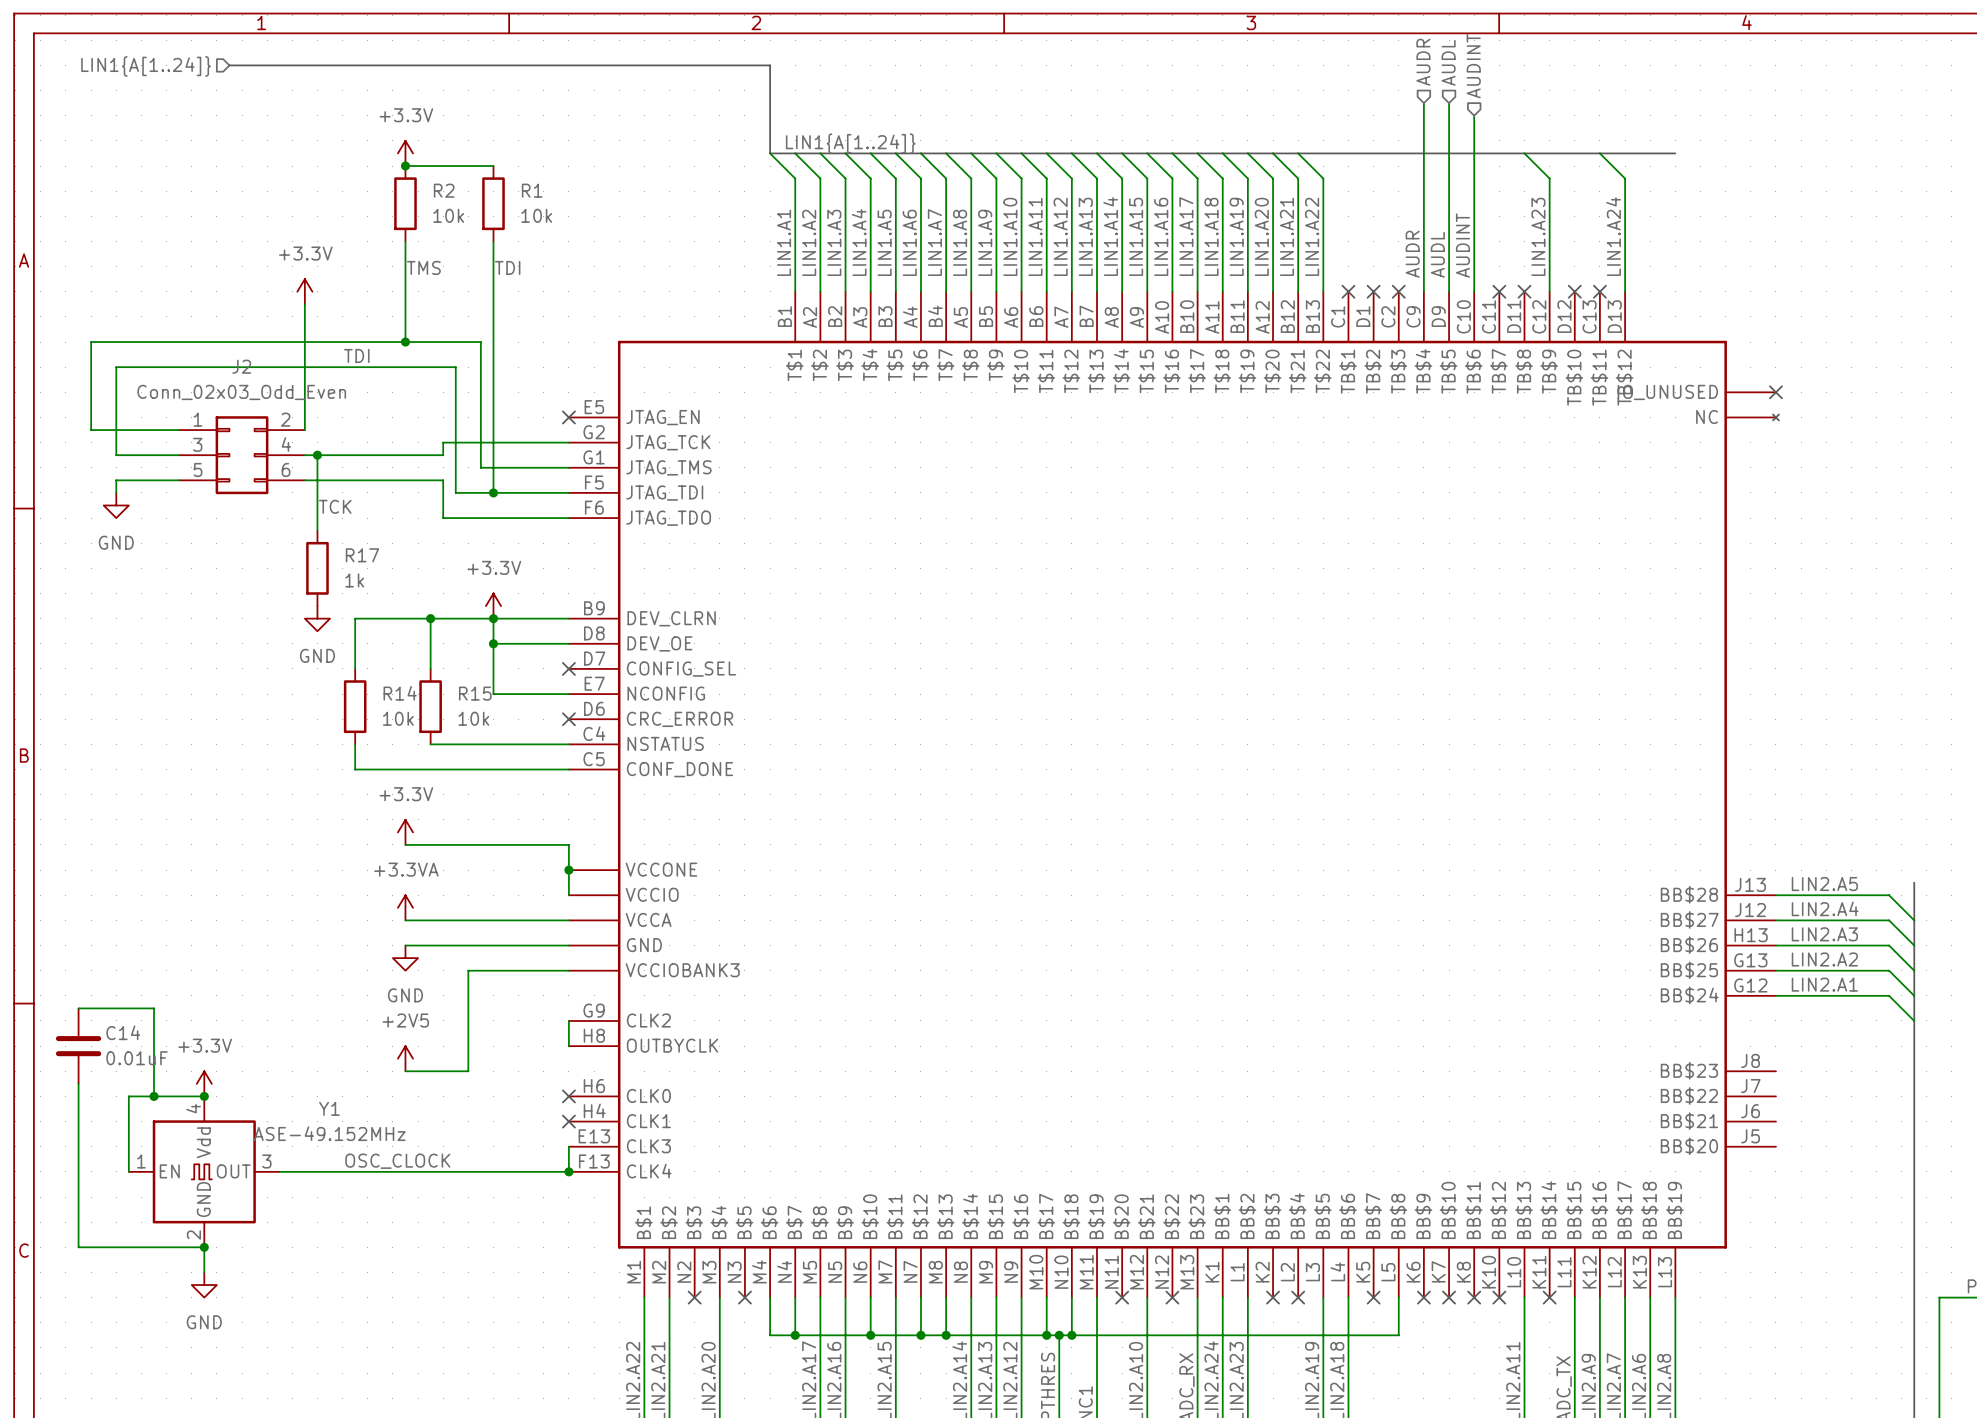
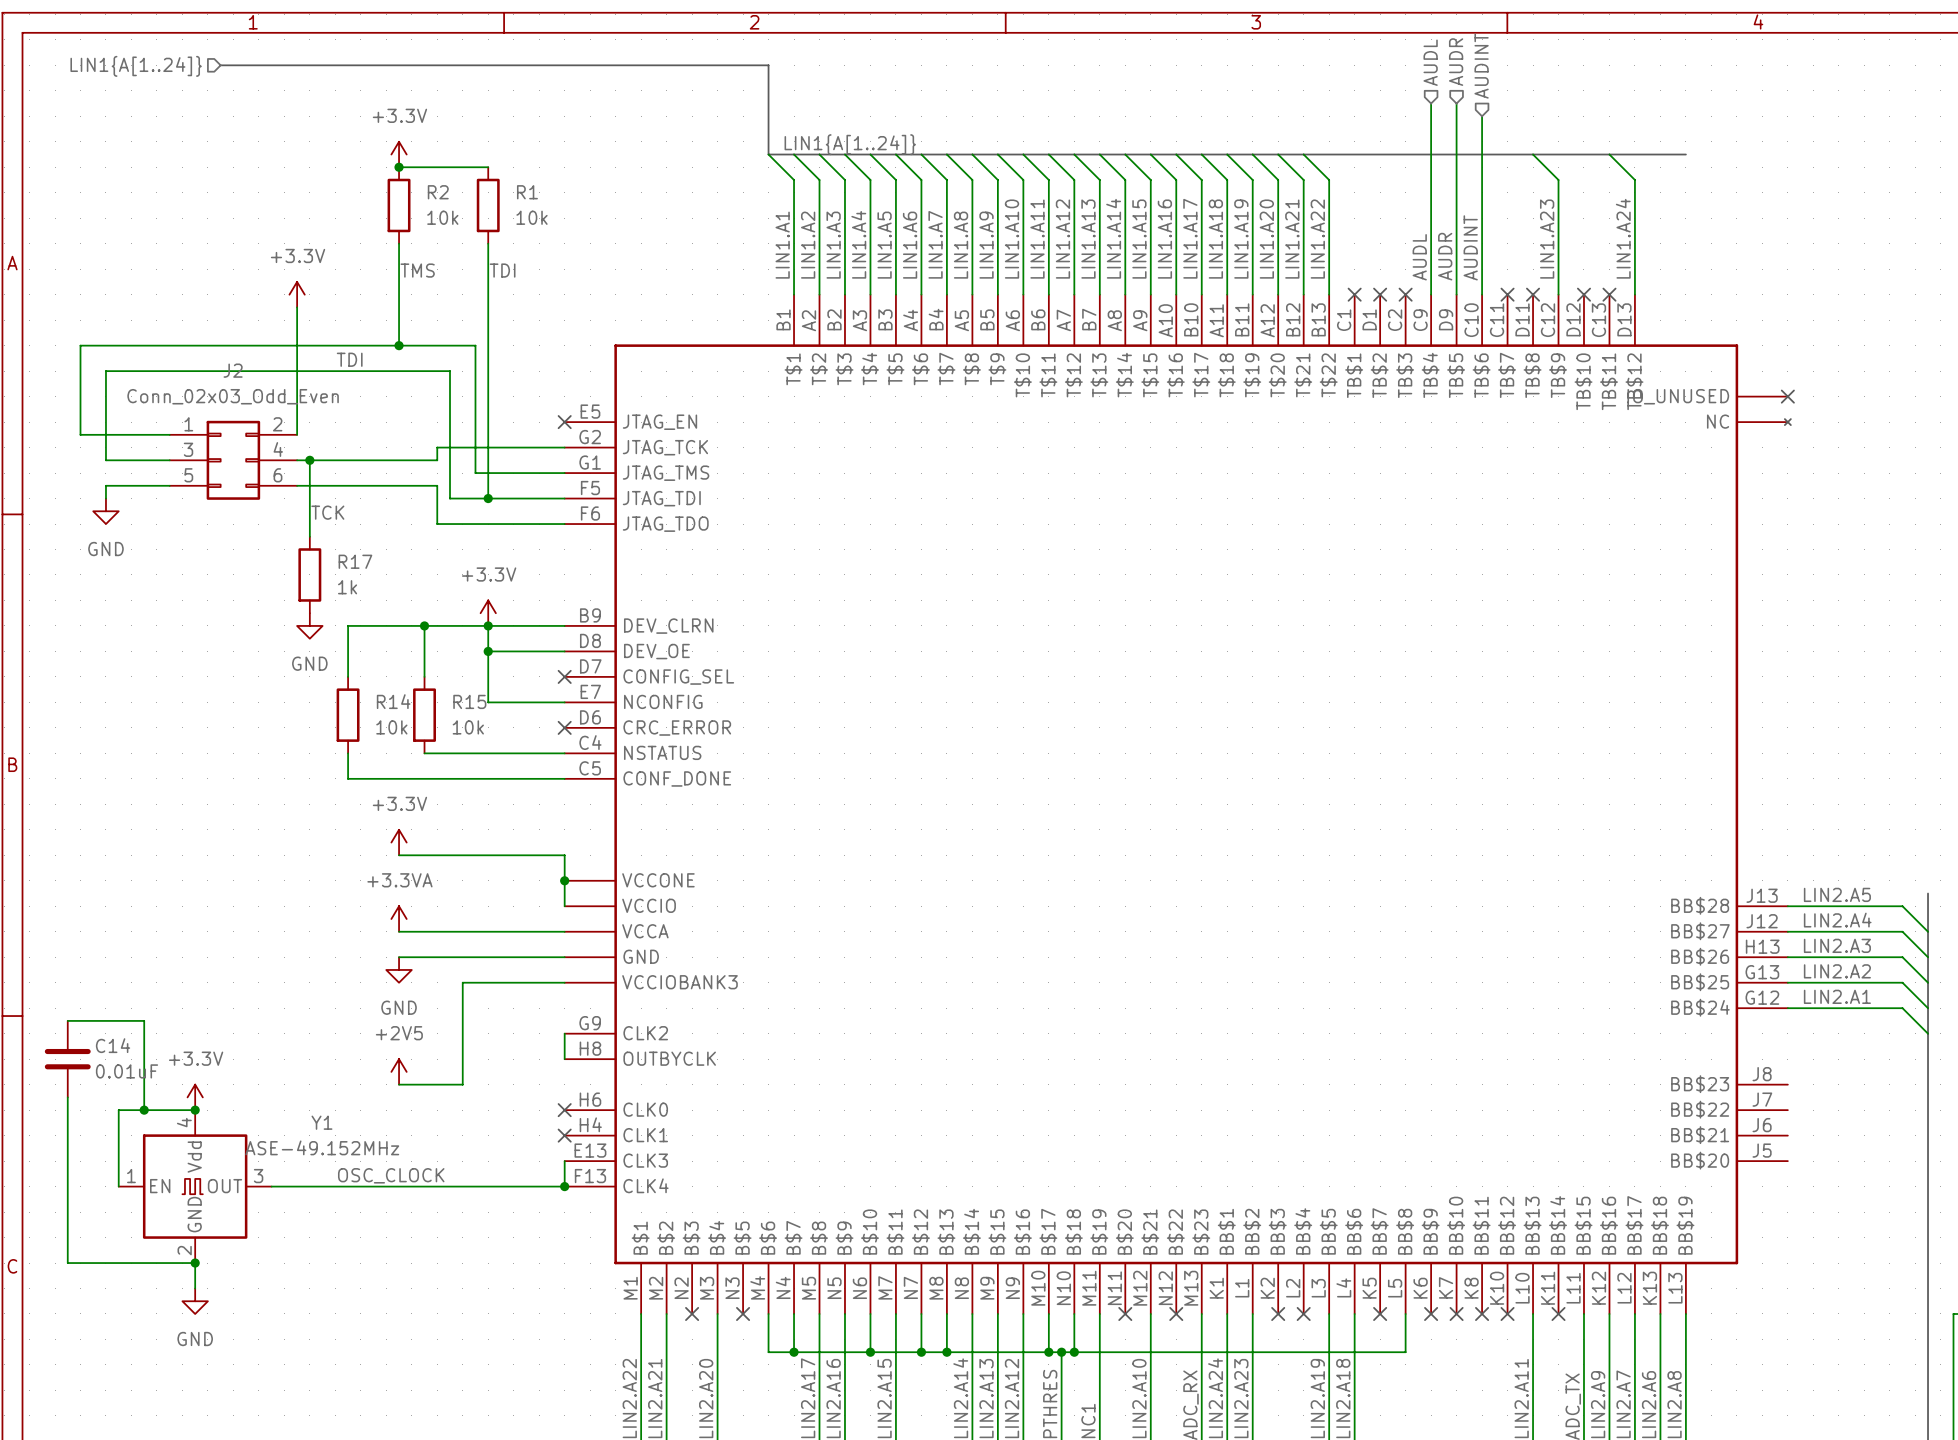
hierarchical label: AUDR (1423, 62) -> AUDL (1430, 62)
hierarchical label: AUDL (1448, 62) -> AUDR (1456, 62)
label: AUDR (1412, 254) -> AUDL (1419, 257)
label: AUDL (1437, 254) -> AUDR (1445, 256)

